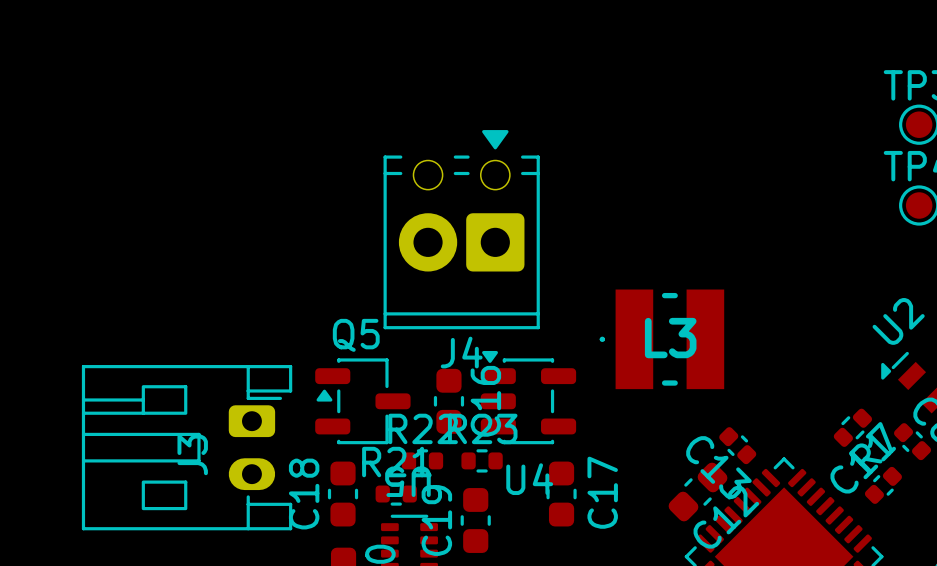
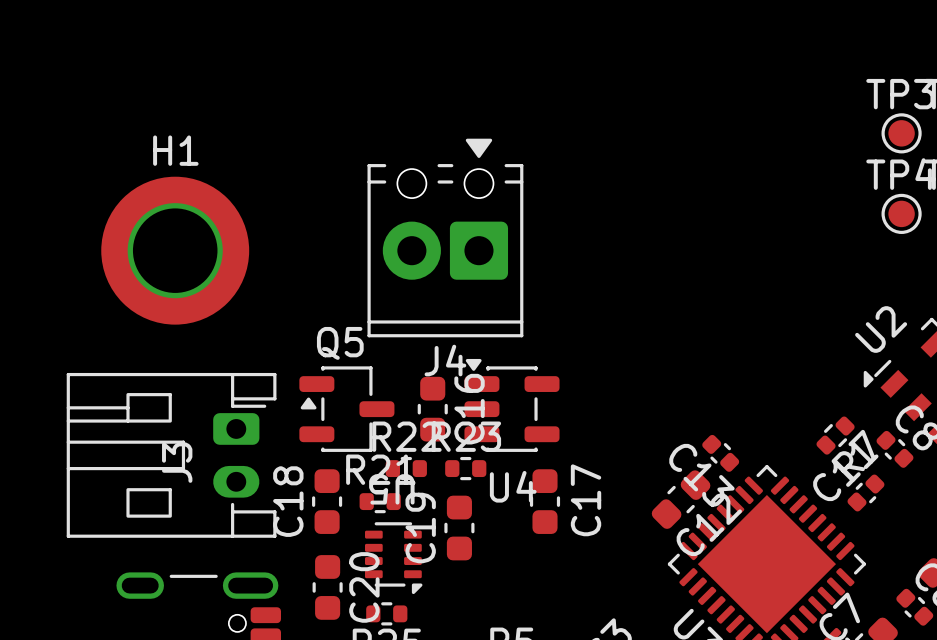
H1: none -> (175, 250)
L3: (661, 339) -> none

